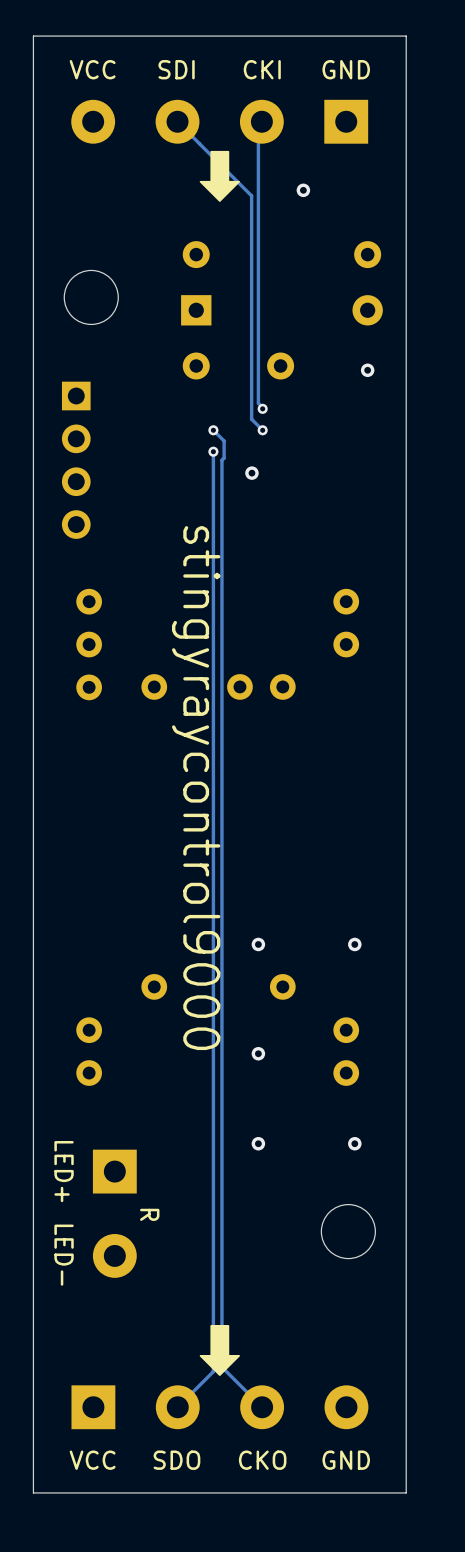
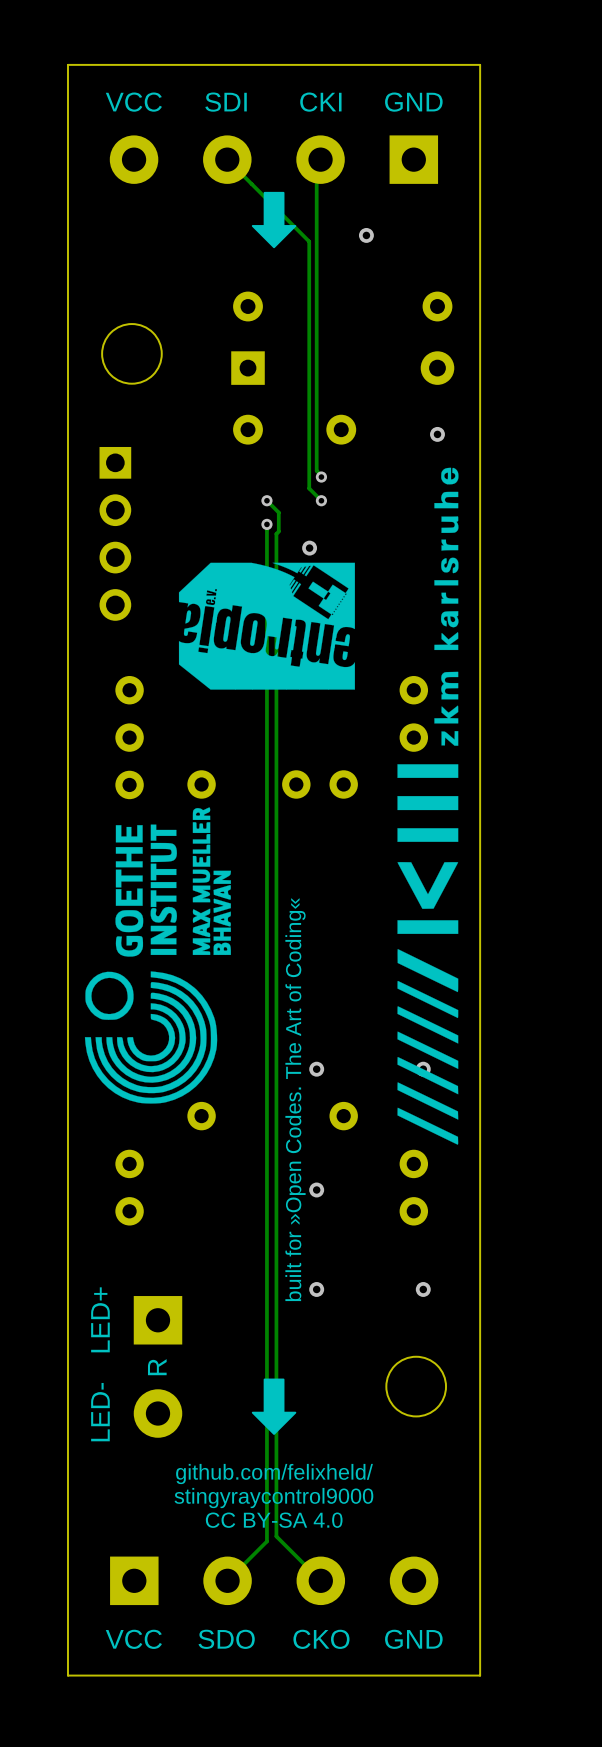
drawing: none -> [397, 467, 459, 1145]
drawing: none -> [178, 562, 355, 690]
drawing: none -> [84, 807, 232, 1104]
text: stingyraycontrol9000 (196, 788) -> none
text: none -> built for »Open Codes. The Art of Coding« (295, 1099)
text rotation: 0° (64, 1171) -> 180° (100, 1319)
text rotation: 0° (149, 1214) -> 180° (157, 1367)
text rotation: 0° (64, 1255) -> 180° (100, 1412)
text: none -> github.com/felixheld/ (274, 1474)
text: none -> stingyraycontrol9000 (273, 1498)
drawing position: (219, 1350) -> (274, 1406)
text: none -> CC BY-SA 4.0 (274, 1520)

